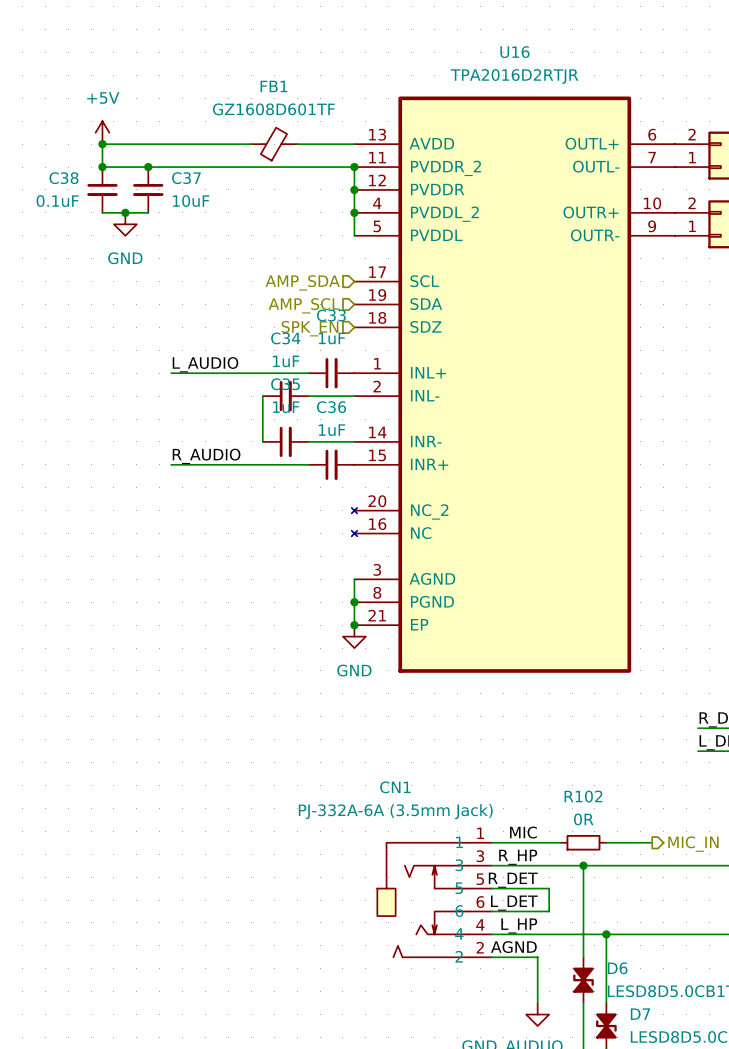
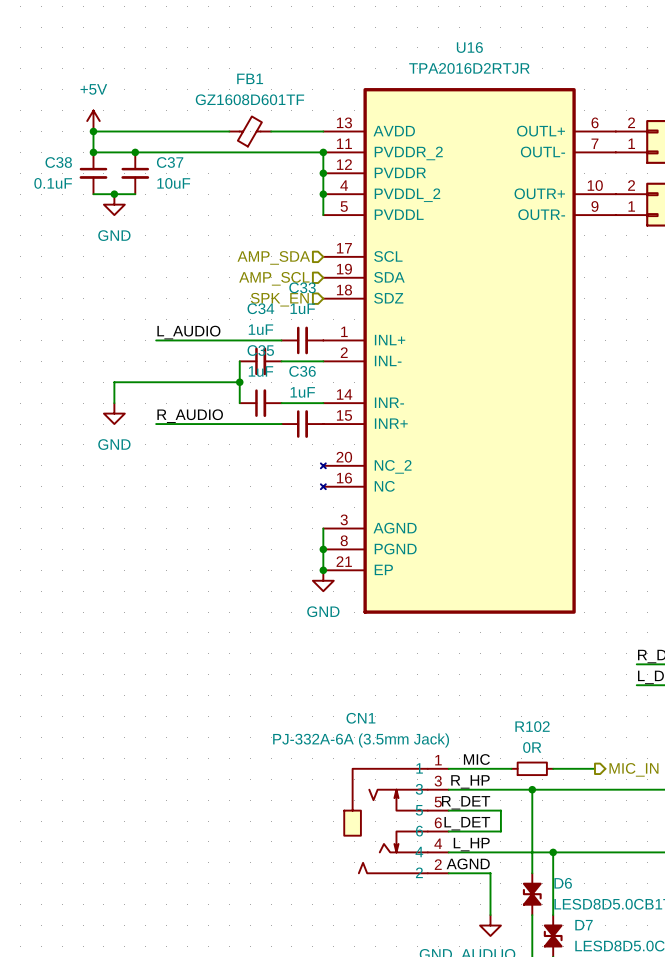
wire: none -> (239, 382) (114, 382) (114, 403)
junction: none -> (239, 382)
power symbol: none -> GND (114, 413)

